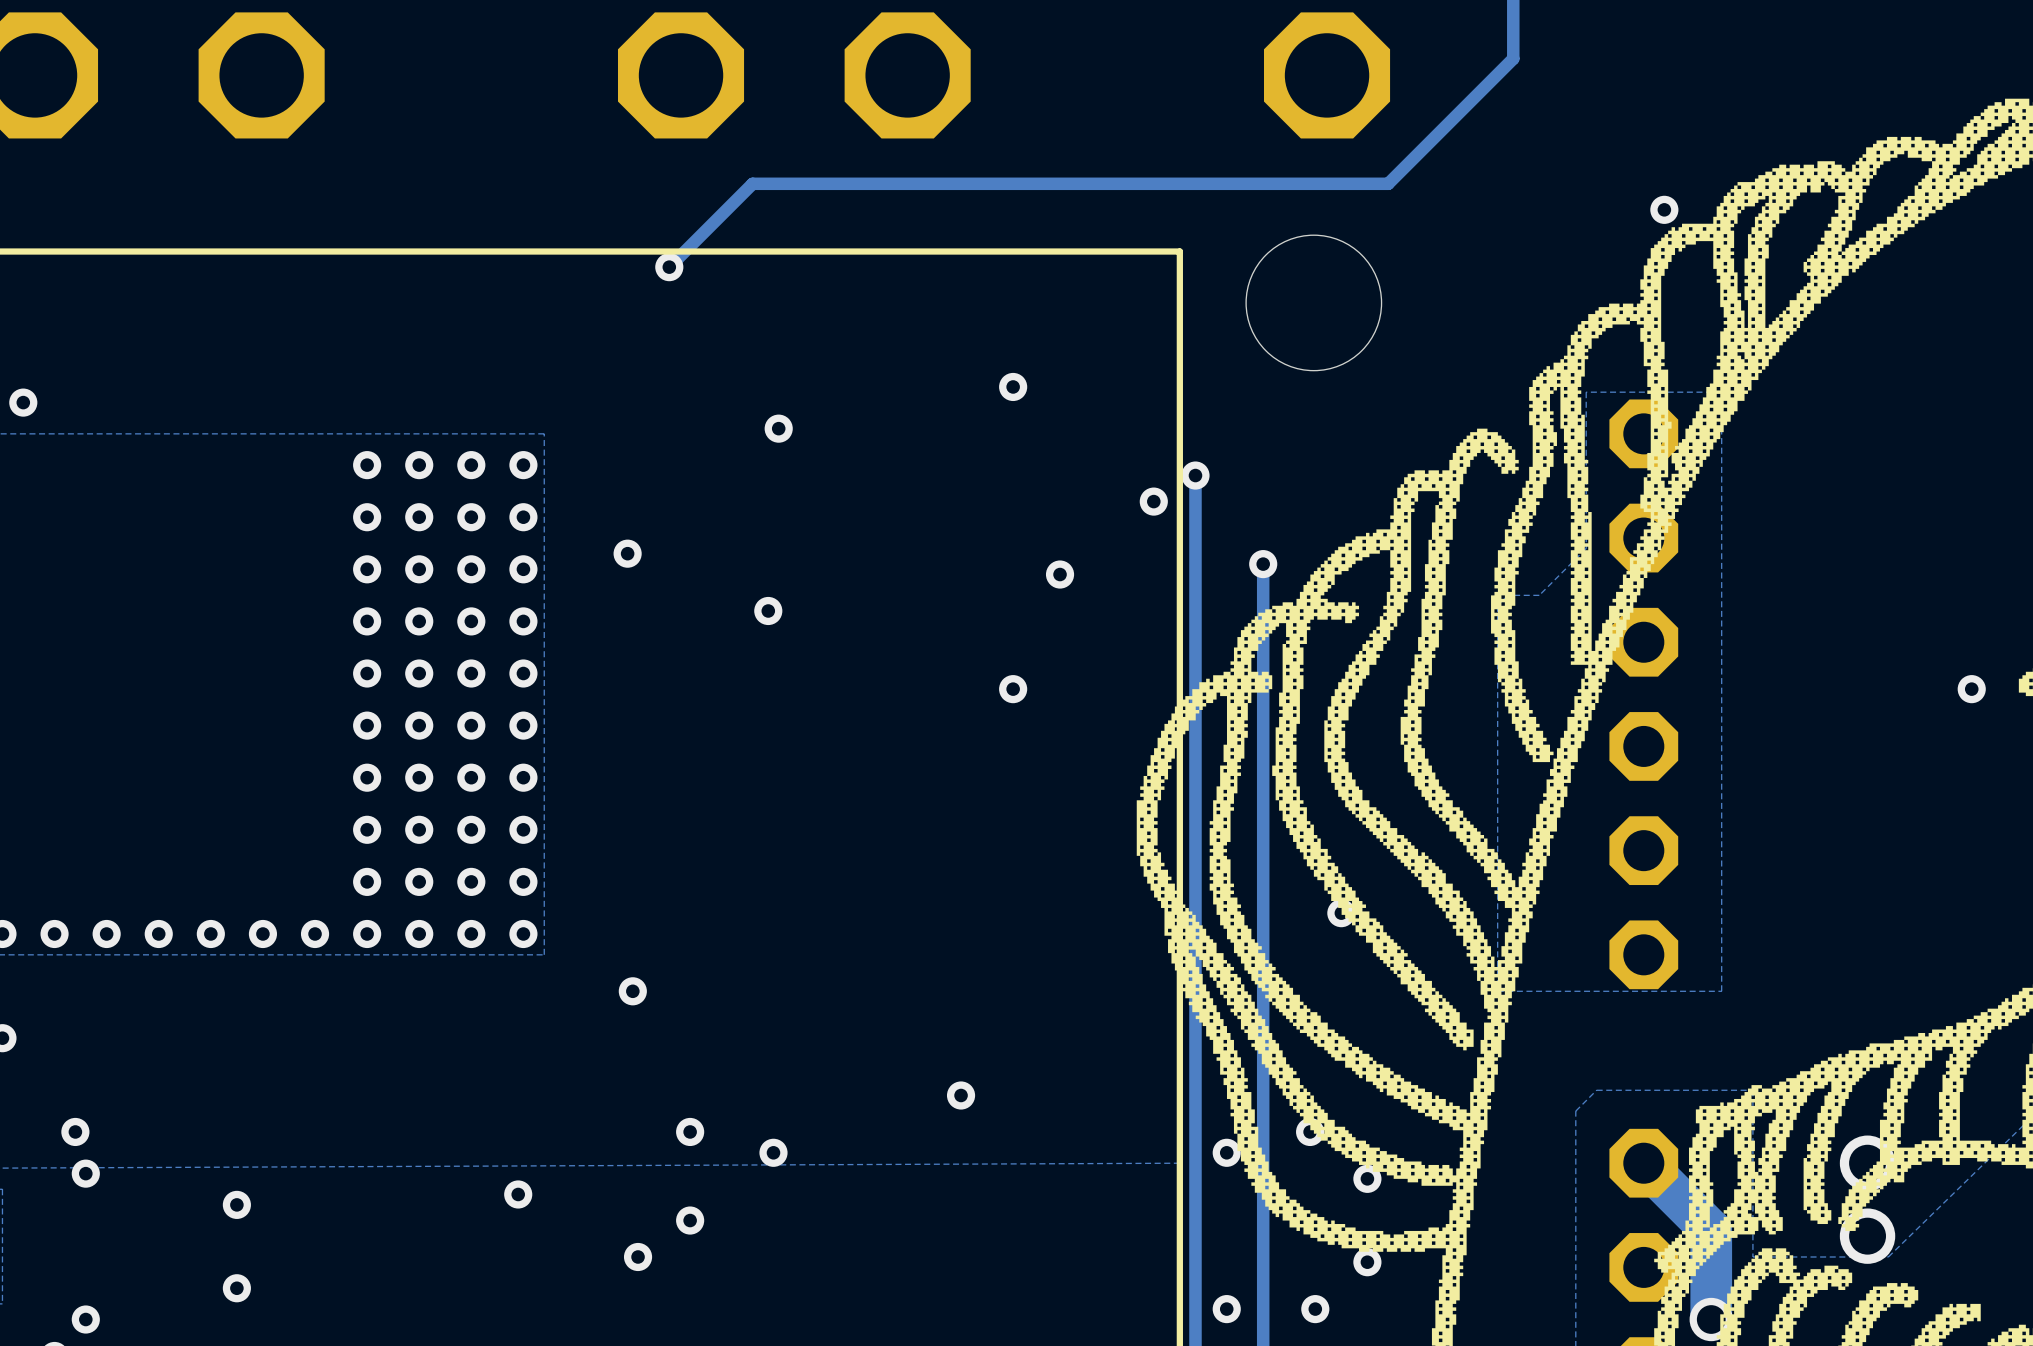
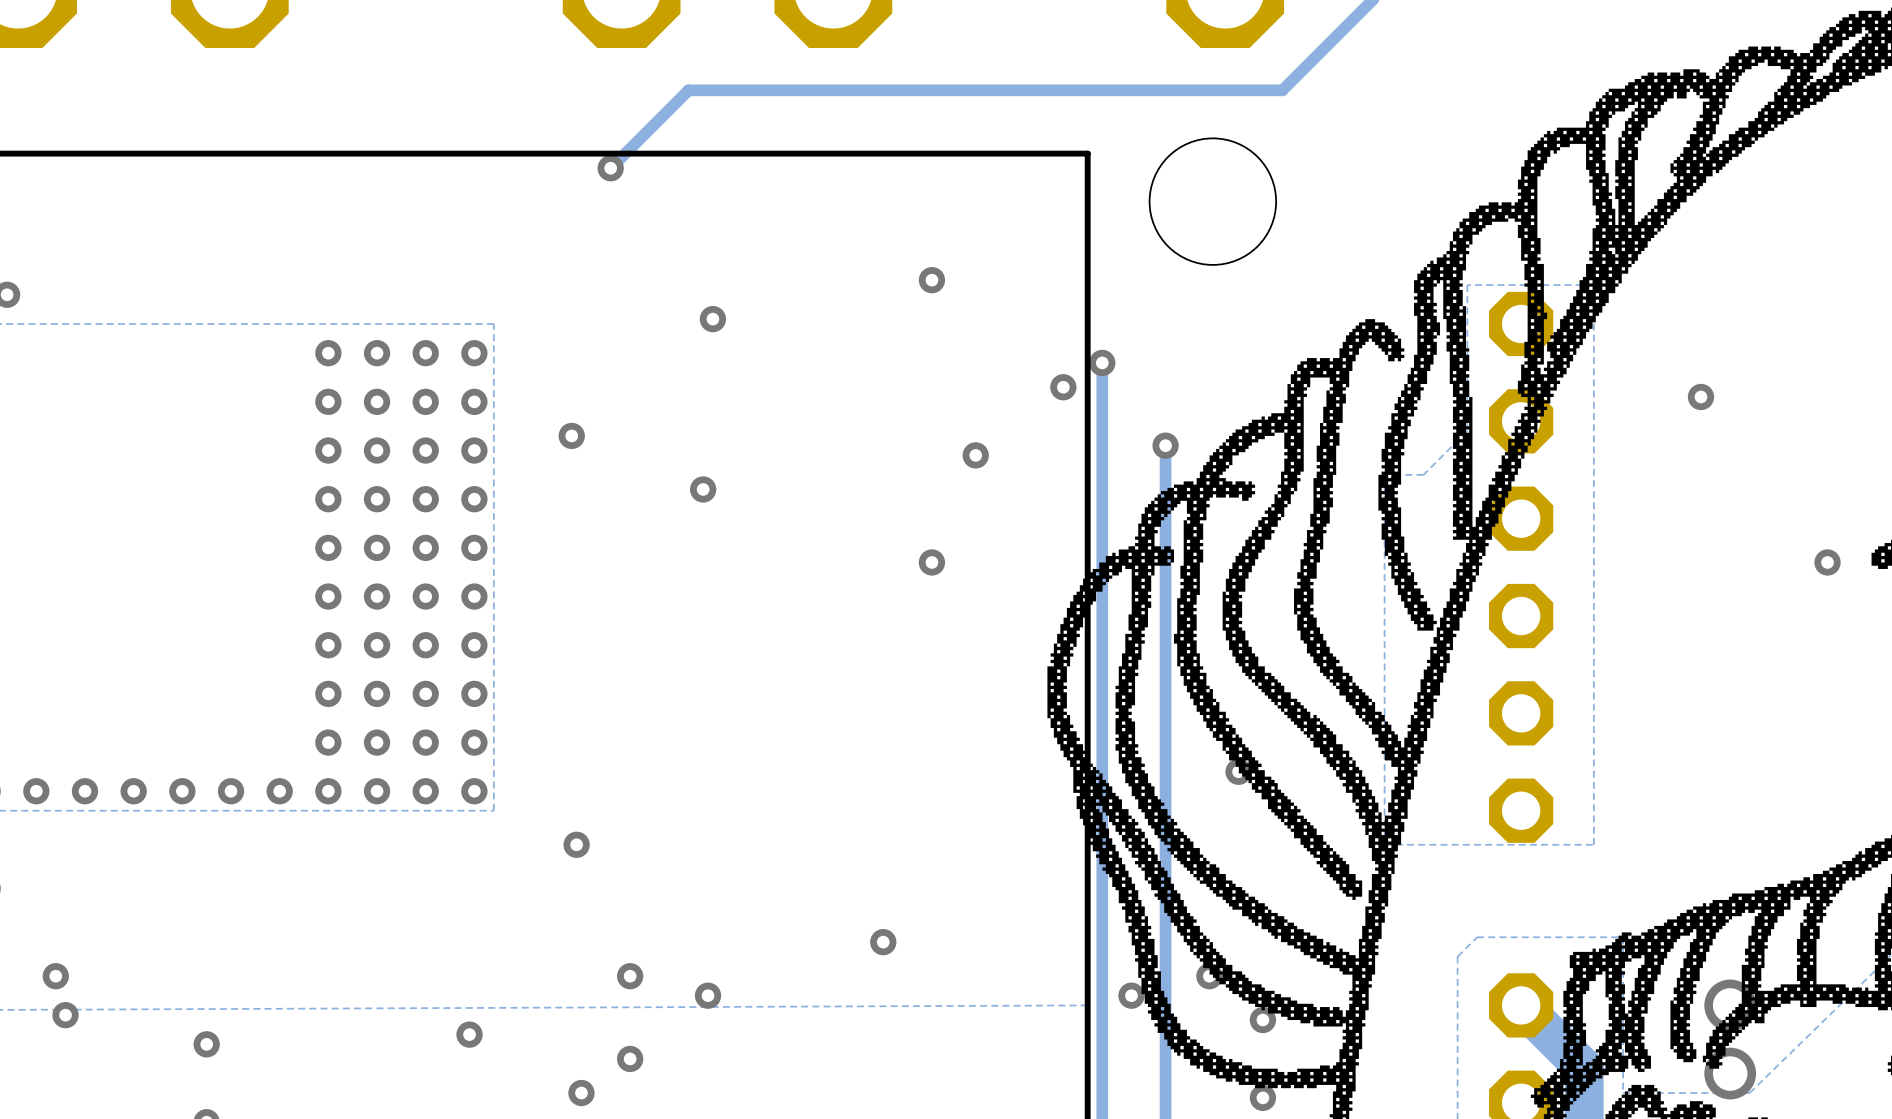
via: (1664, 209) -> none
via: none -> (1700, 396)

